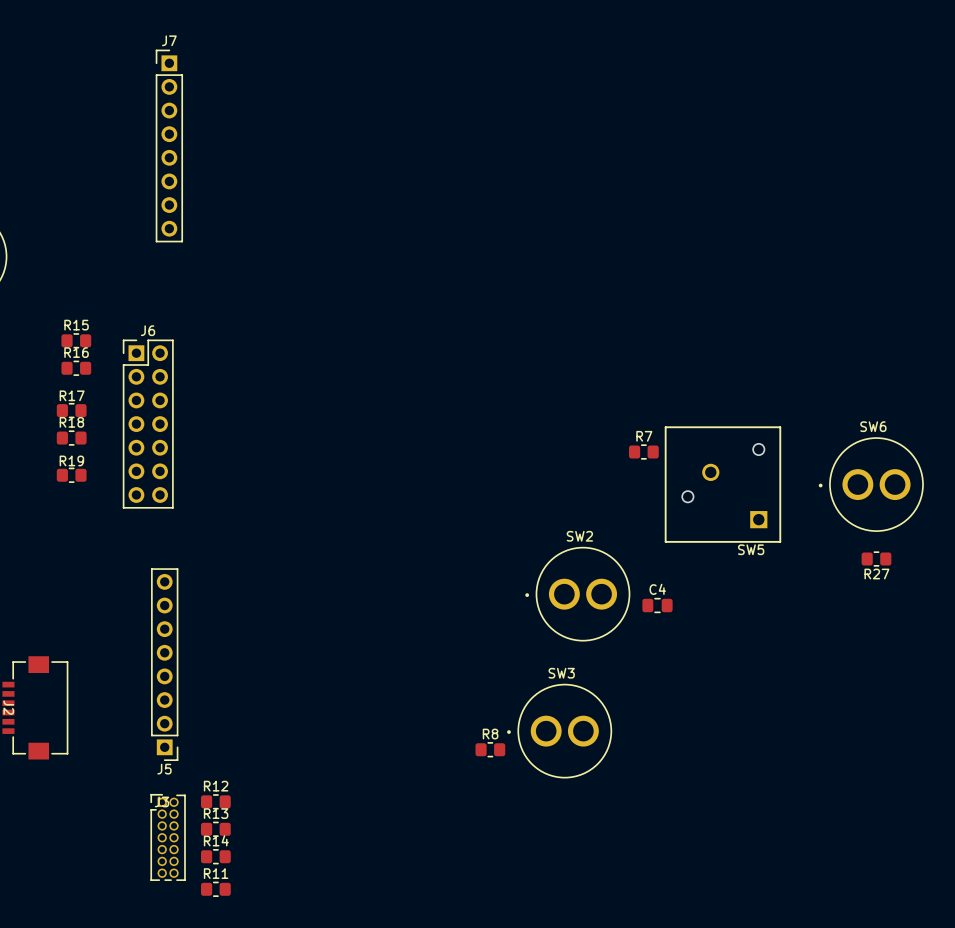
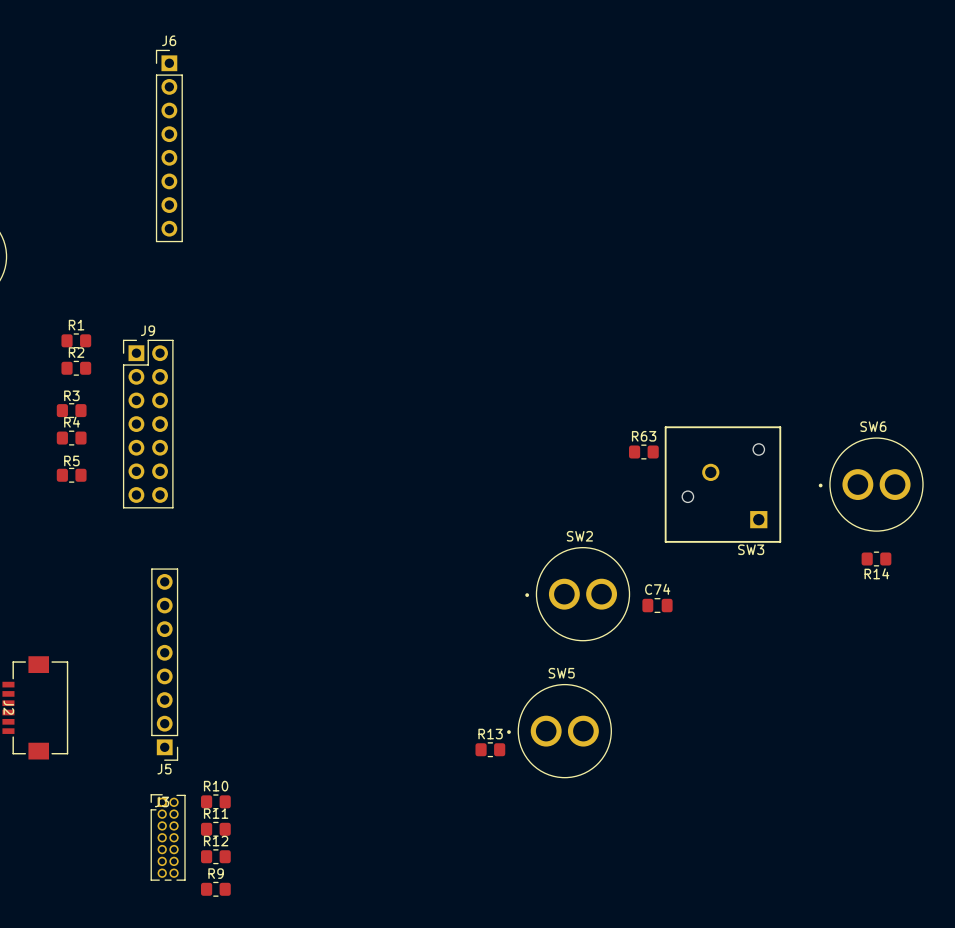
J7 name: J7 (169, 40) -> J6 (169, 40)
R15 name: R15 (76, 325) -> R1 (76, 325)
J6 name: J6 (148, 330) -> J9 (148, 330)
R16 name: R16 (76, 352) -> R2 (76, 352)
R17 name: R17 (72, 395) -> R3 (71, 395)
R18 name: R18 (71, 422) -> R4 (72, 422)
R7 name: R7 (644, 436) -> R63 (644, 436)
R19 name: R19 (71, 460) -> R5 (71, 460)
SW5 name: SW5 (751, 549) -> SW3 (751, 549)
R27 name: R27 (876, 574) -> R14 (876, 573)
C4 name: C4 (657, 589) -> C74 (657, 589)
SW3 name: SW3 (561, 673) -> SW5 (561, 673)
R8 name: R8 (490, 734) -> R13 (490, 734)
R12 name: R12 (216, 786) -> R10 (216, 786)
R13 name: R13 (216, 813) -> R11 (216, 813)
R14 name: R14 (216, 840) -> R12 (216, 841)
R11 name: R11 (216, 873) -> R9 (216, 873)

